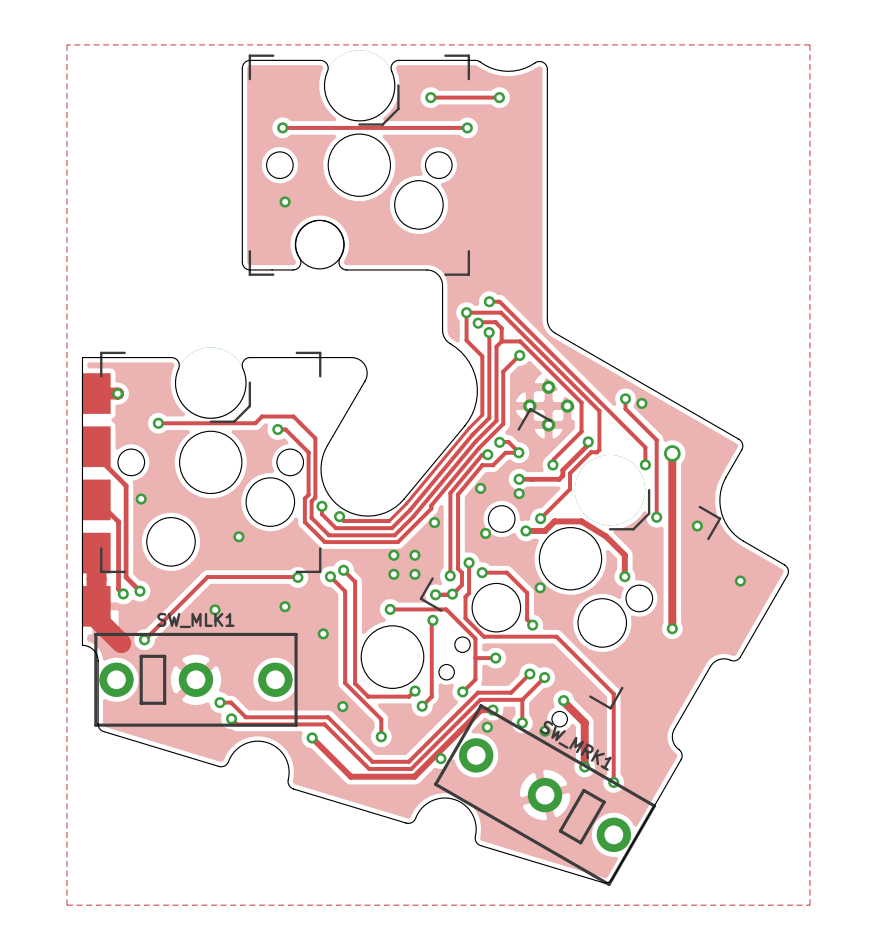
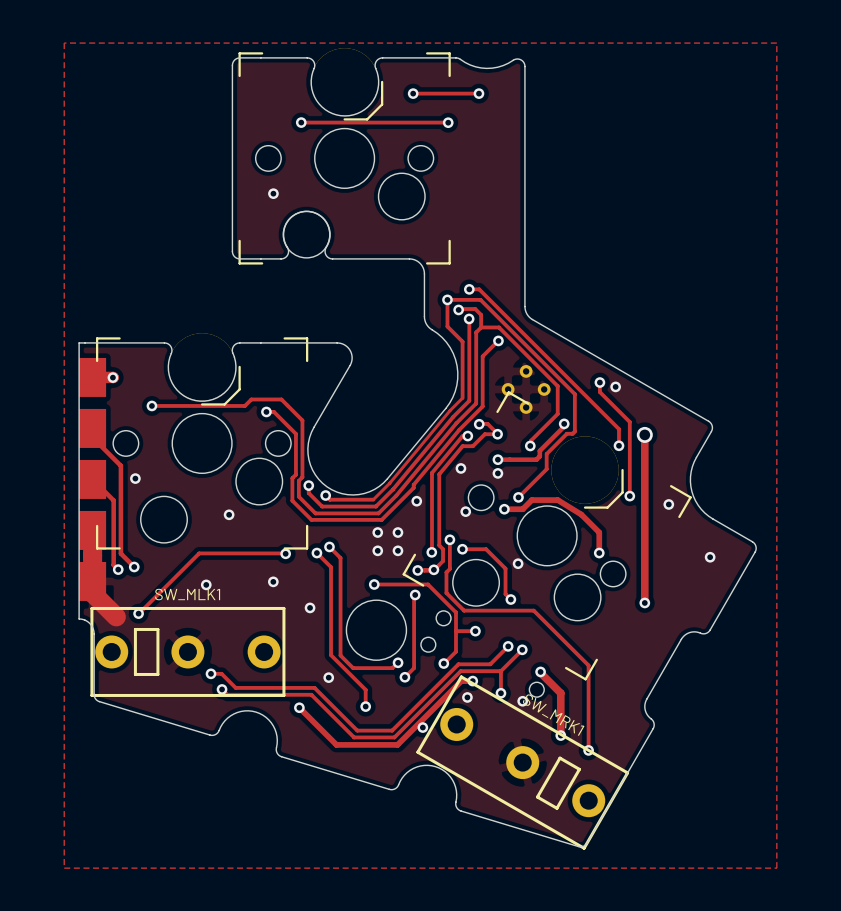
track: (282, 127) (467, 127) -> (301, 122) (448, 122)
via position: (282, 127) -> (301, 122)

